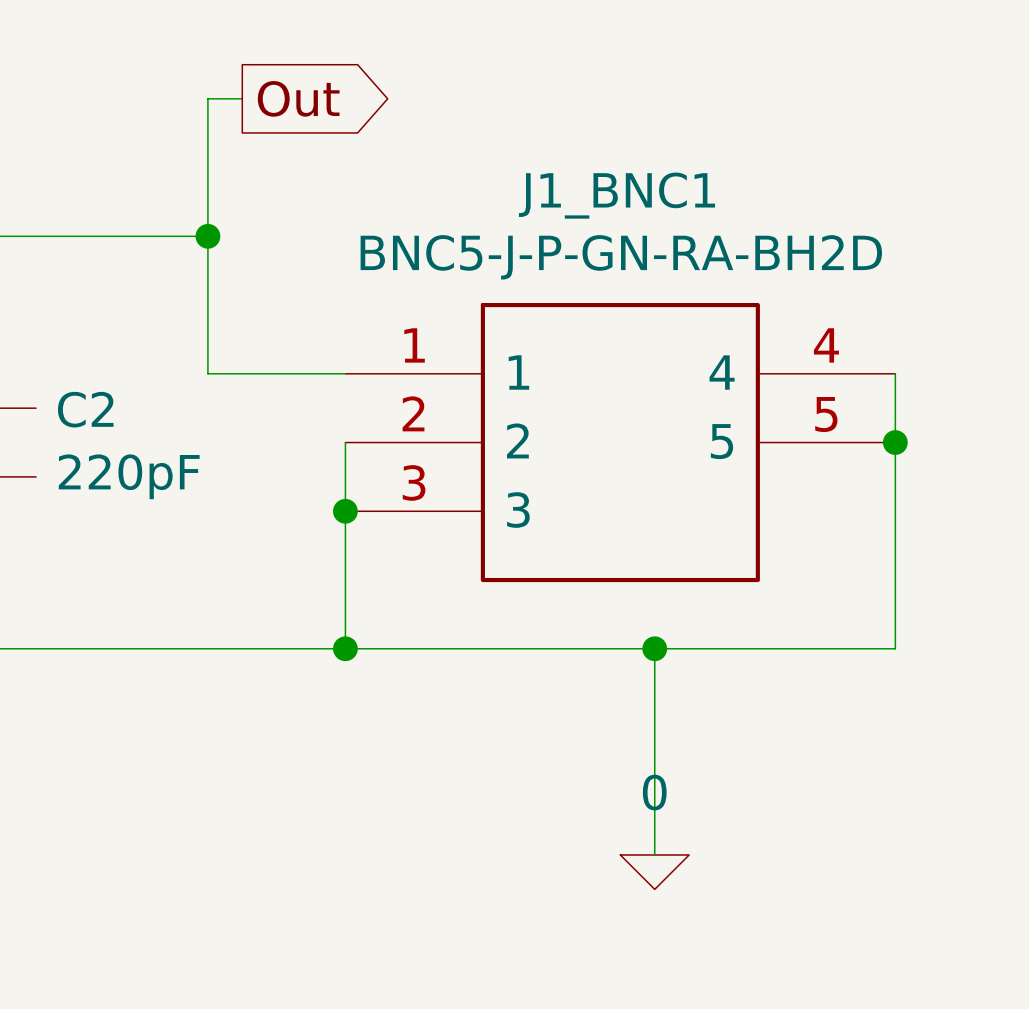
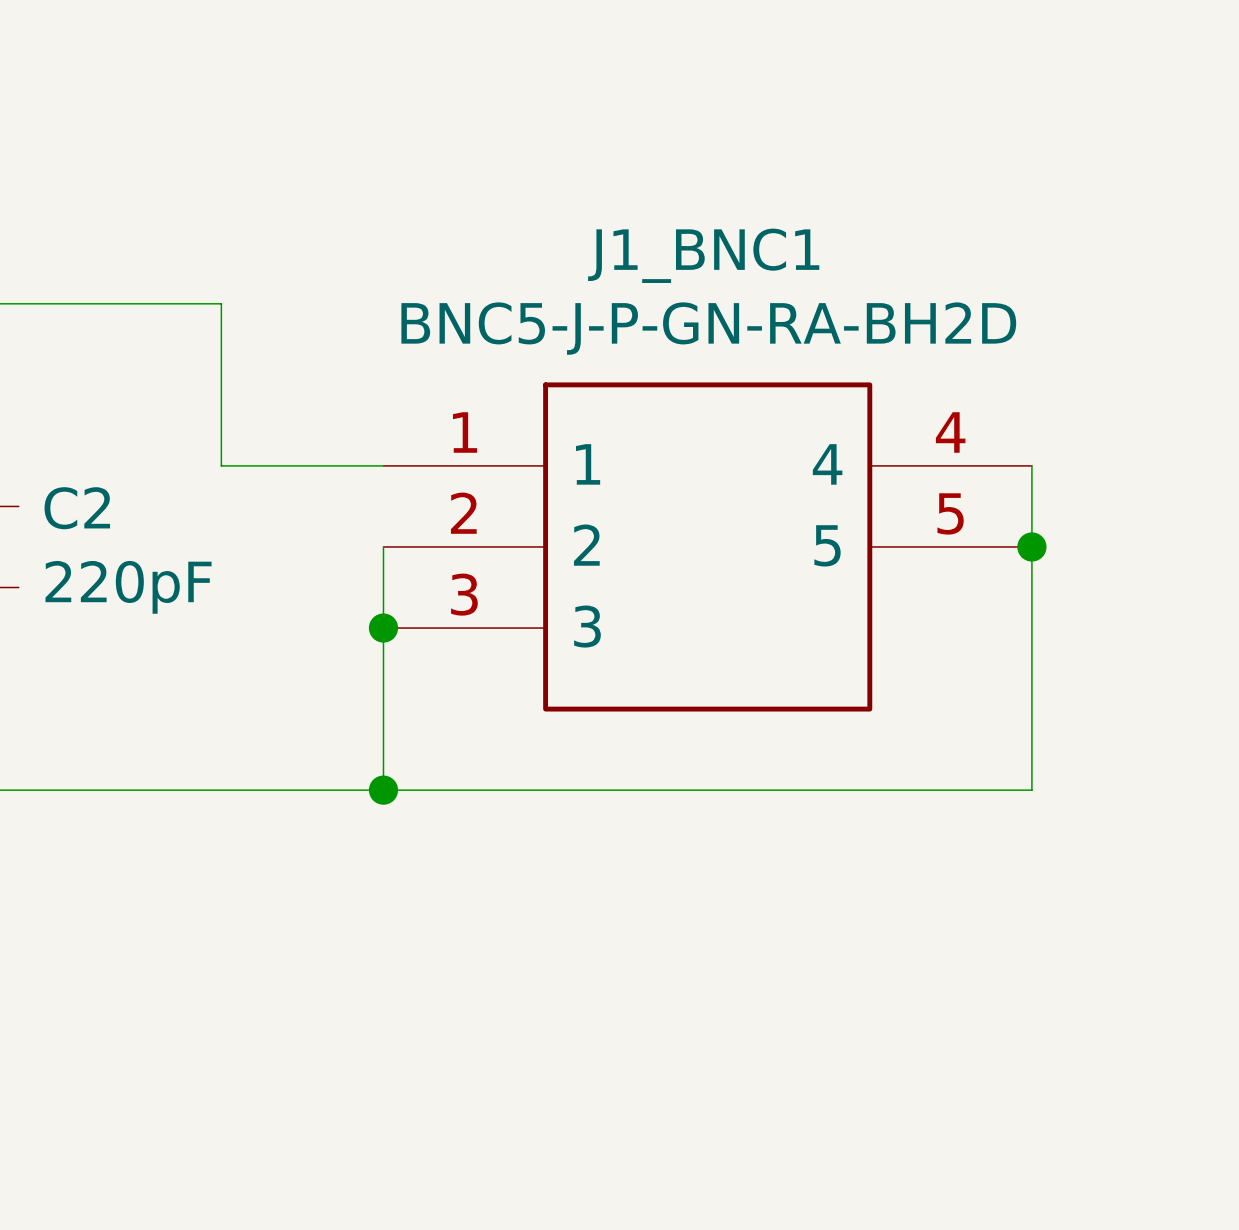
wire: (242, 98) (207, 98) (207, 236) -> none
global label: Out (298, 98) -> none
junction: (207, 236) -> none
wire: (654, 648) (654, 854) -> none
junction: (654, 648) -> none
power symbol: 0 (654, 872) -> none

